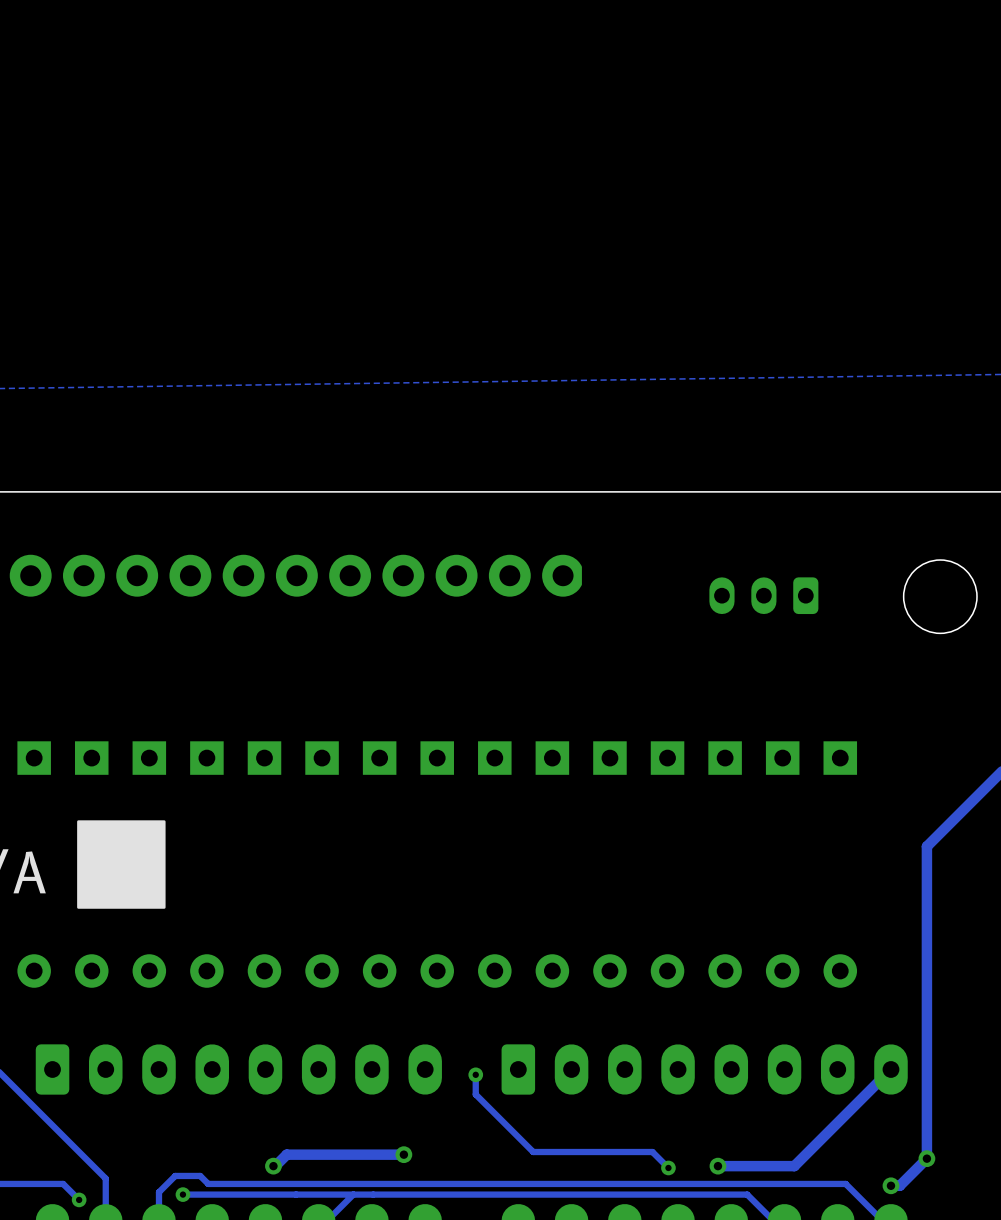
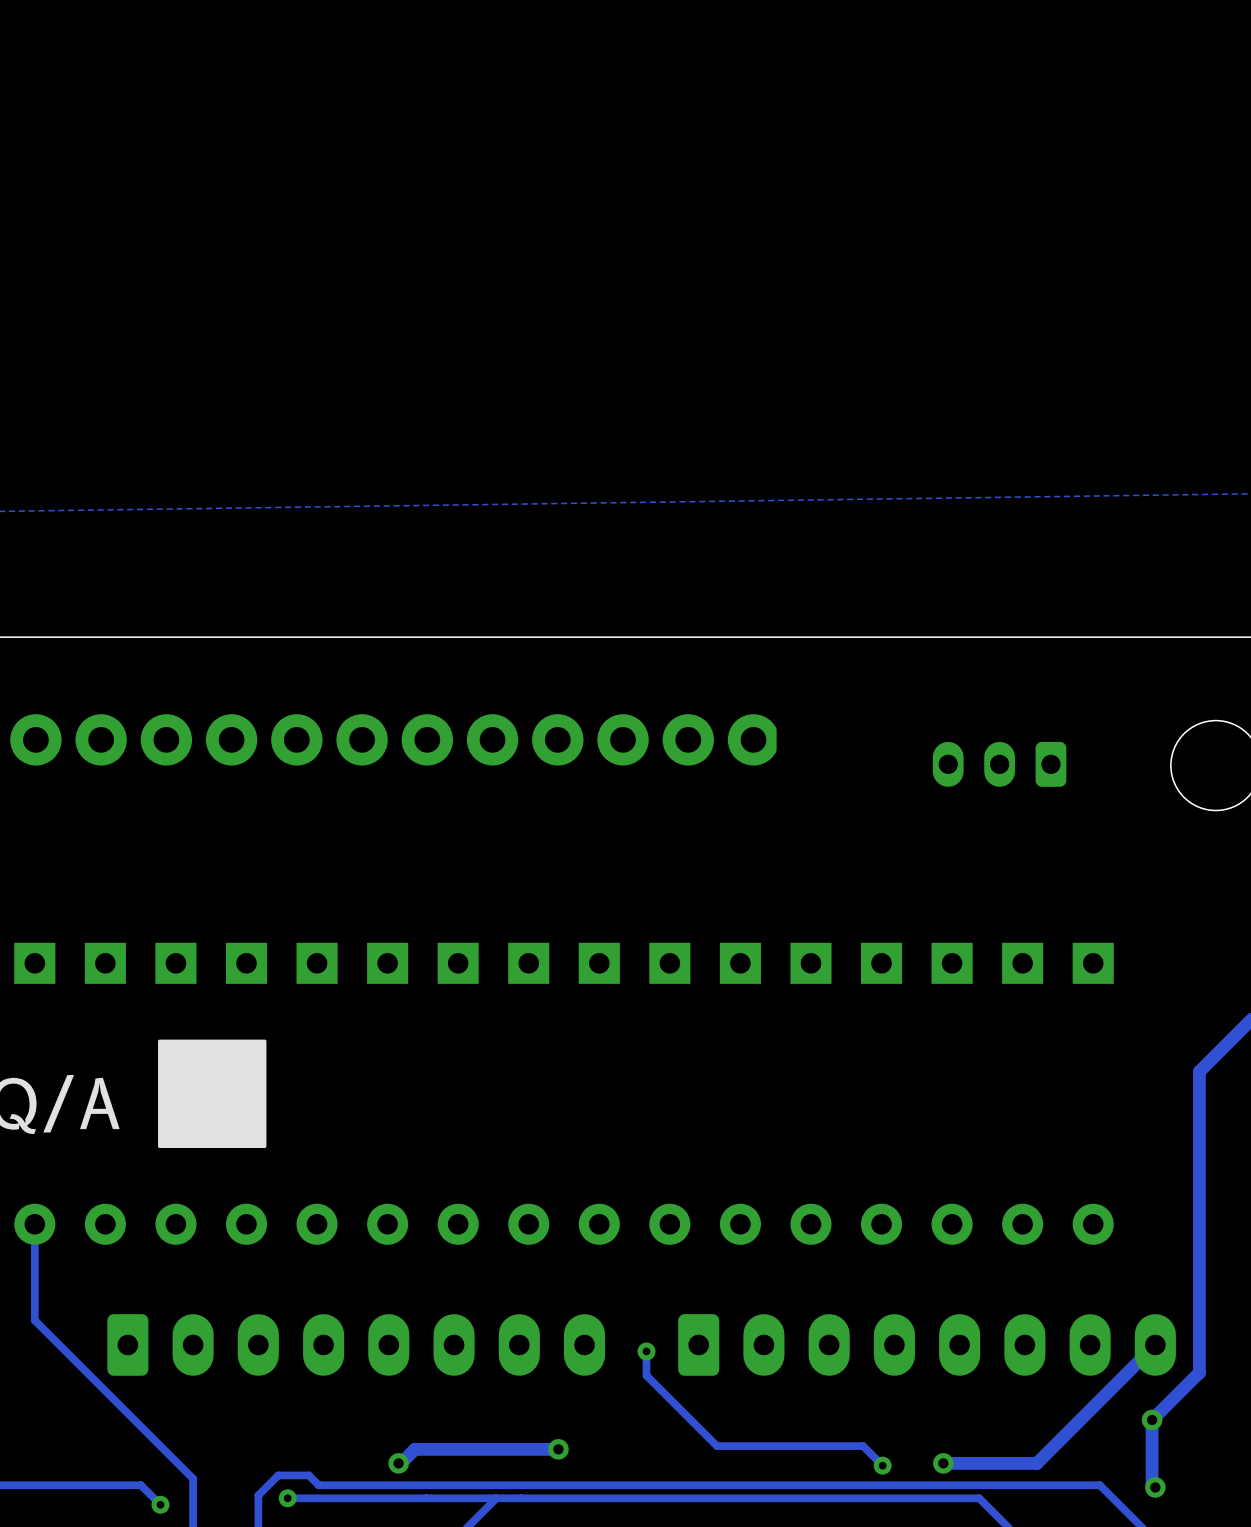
track: (926, 1092) (926, 1158) (899, 1185) (890, 1185) -> (1199, 1372) (1152, 1419) (1152, 1484) (1155, 1487)
via position: (926, 1158) -> (1152, 1419)

